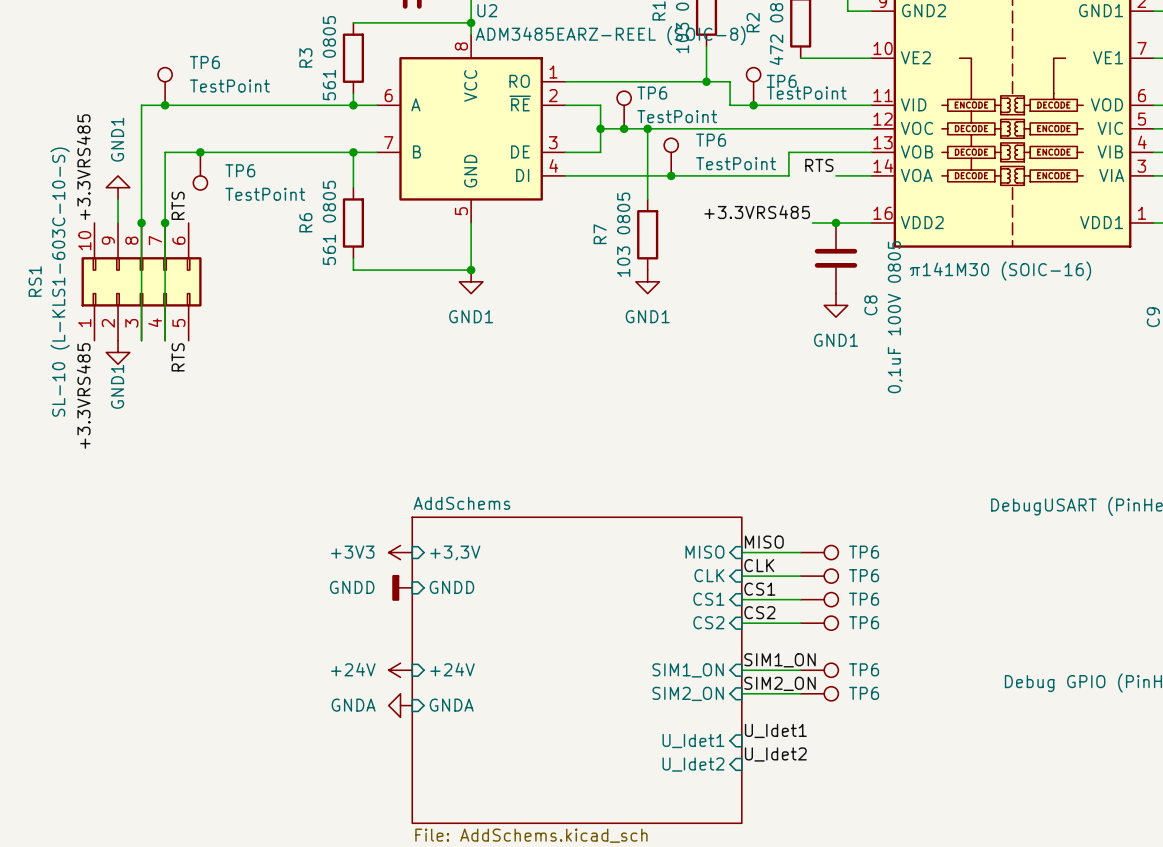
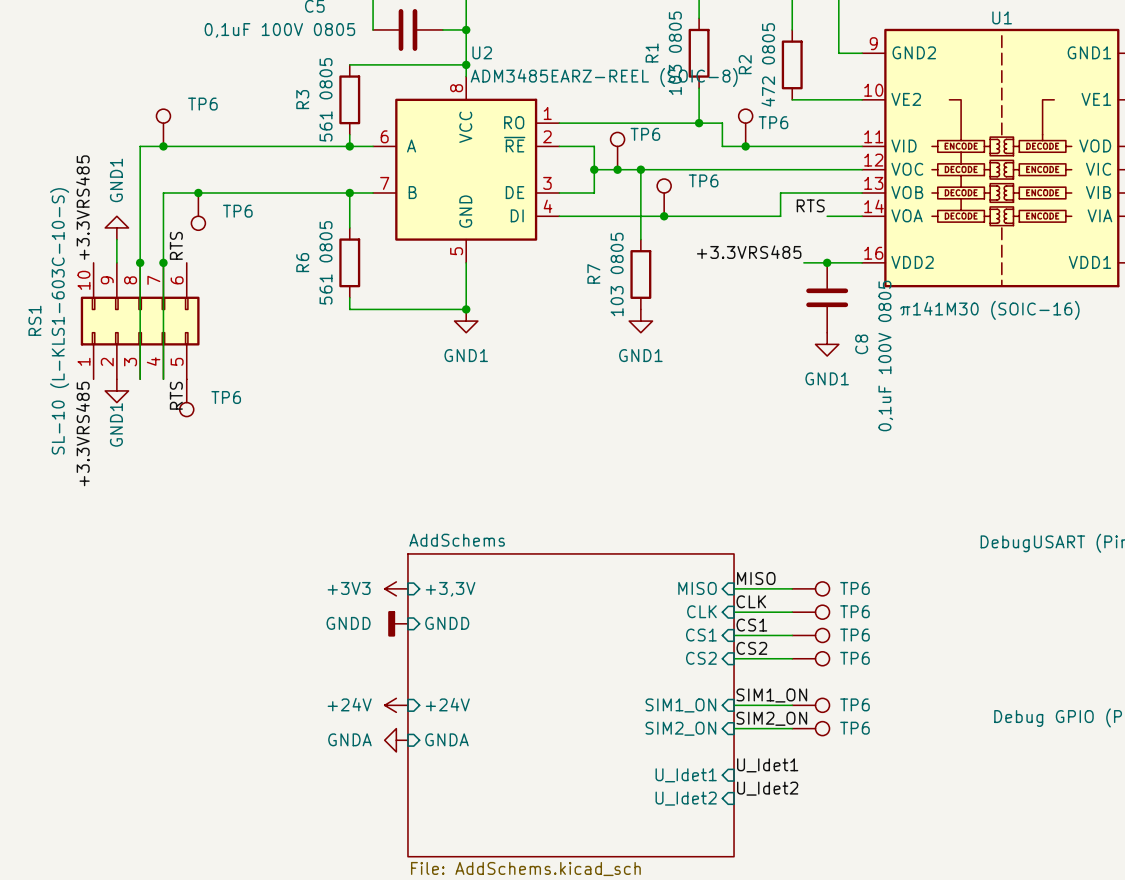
TP6 value: TestPoint (229, 86) -> none
TP6 value: TestPoint (806, 93) -> none
TP6 value: TestPoint (677, 116) -> none
TP6 value: TestPoint (736, 163) -> none
TP6 value: TestPoint (265, 194) -> none
TP6: none -> (186, 397)

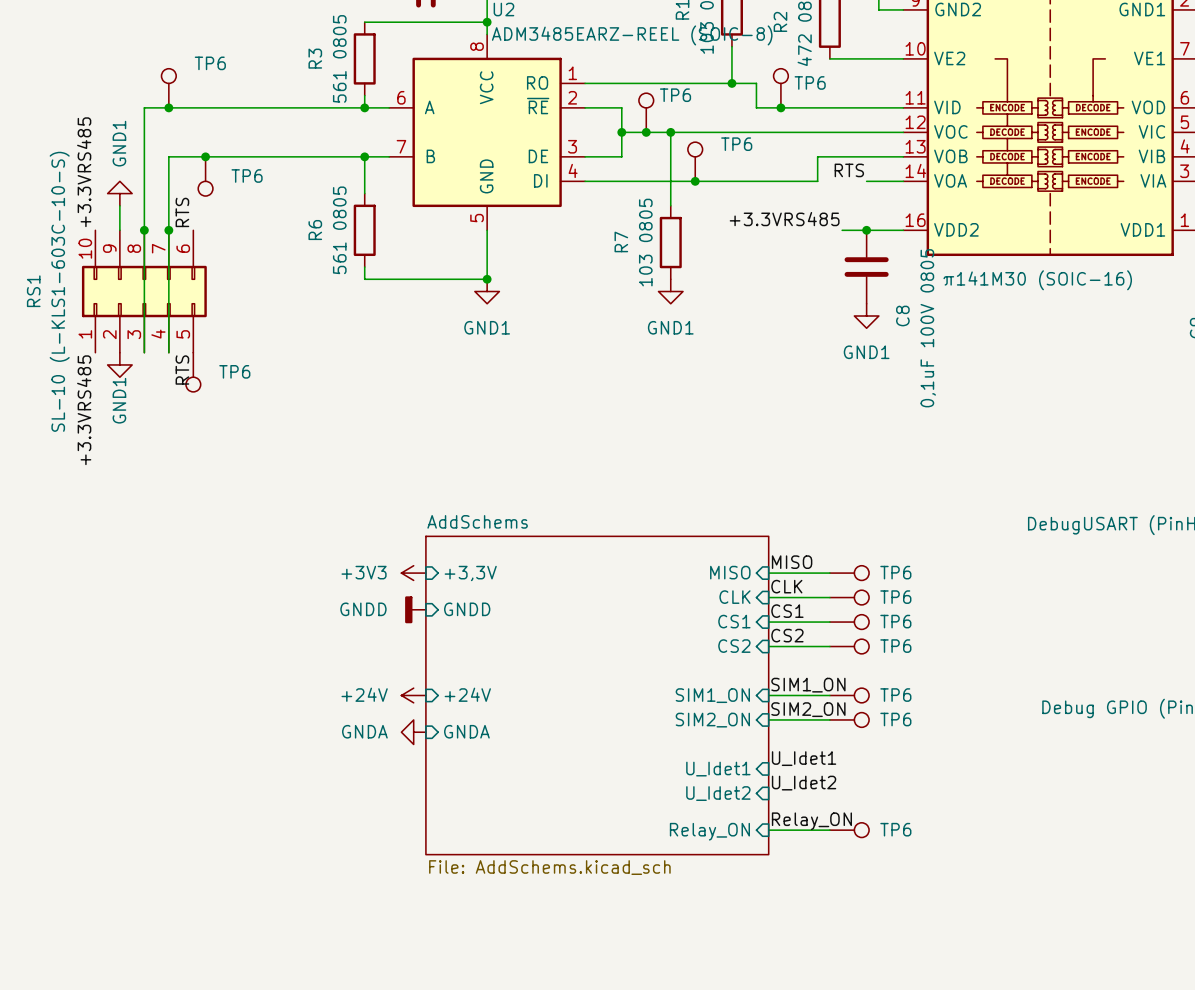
label: none -> Relay_ON (811, 821)
wire: none -> (768, 830) (829, 830)
TP6: none -> (849, 830)
sheet pin: none -> Relay_ON (709, 831)

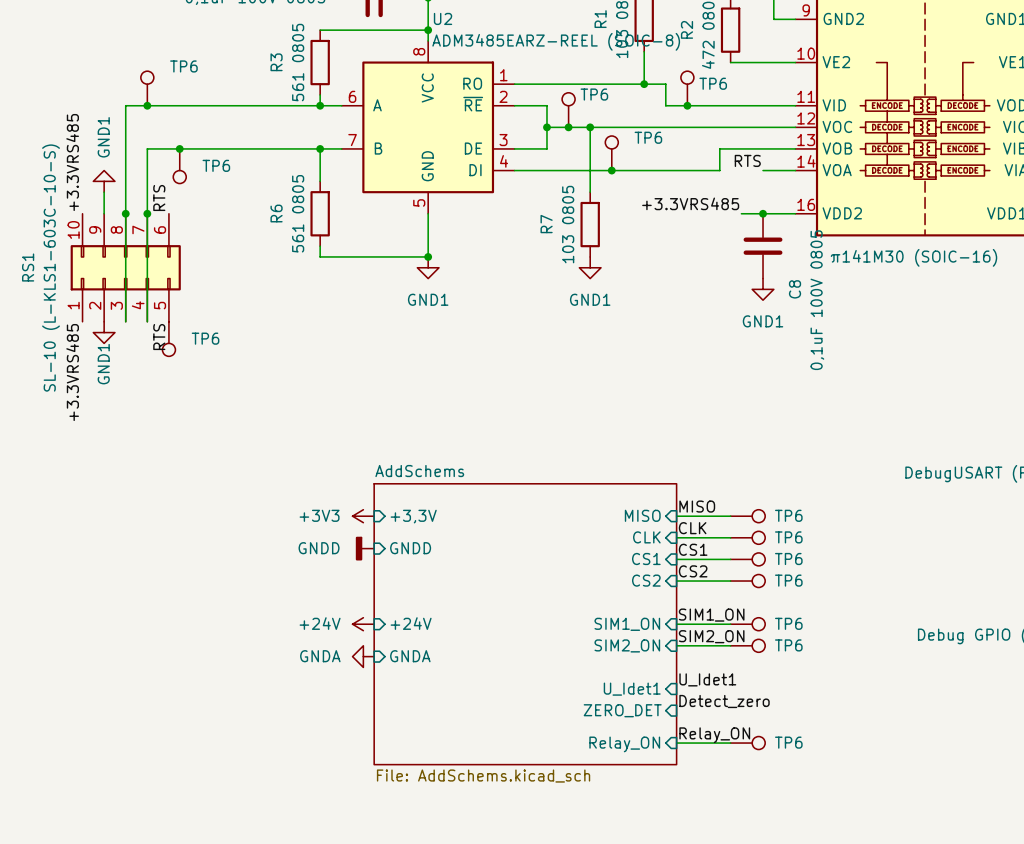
label: U_Idet2 (804, 783) -> Detect_zero (724, 701)
sheet pin: U_Idet2 (718, 793) -> ZERO_DET (622, 710)

